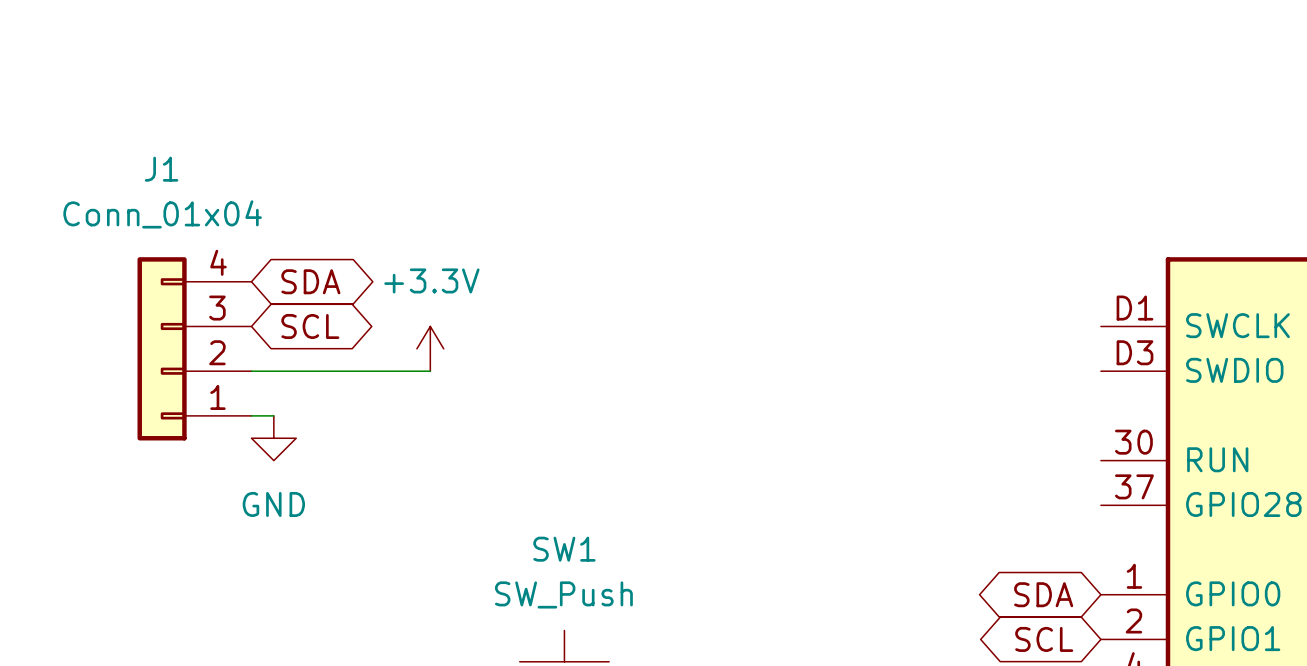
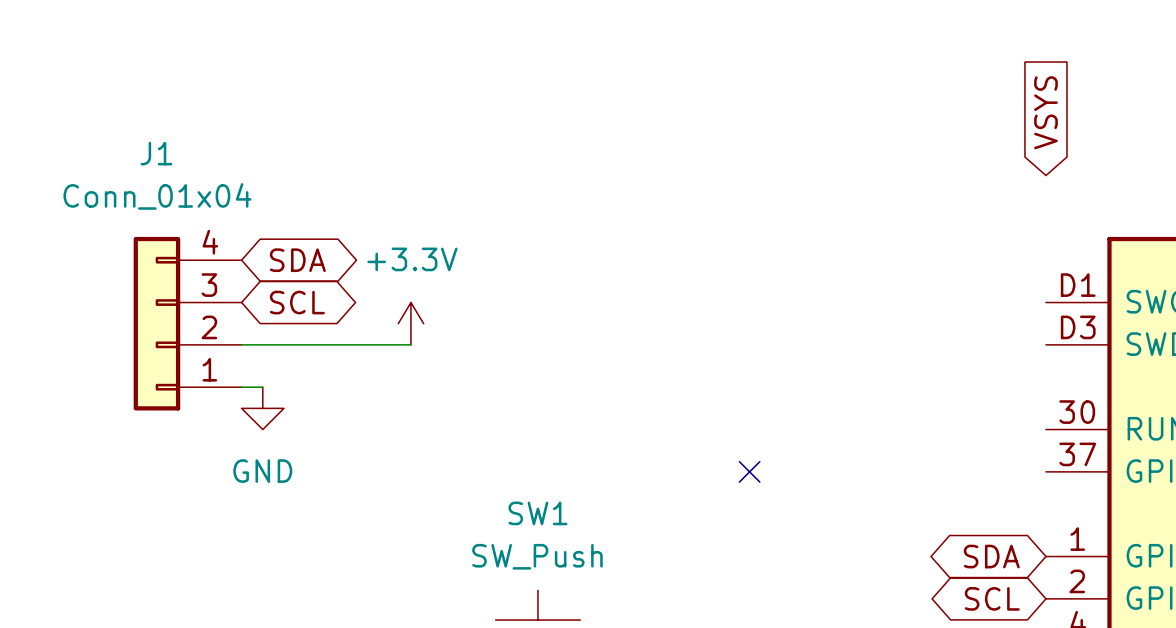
global label: none -> VSYS (1045, 112)
no-connect mark: none -> (749, 471)

